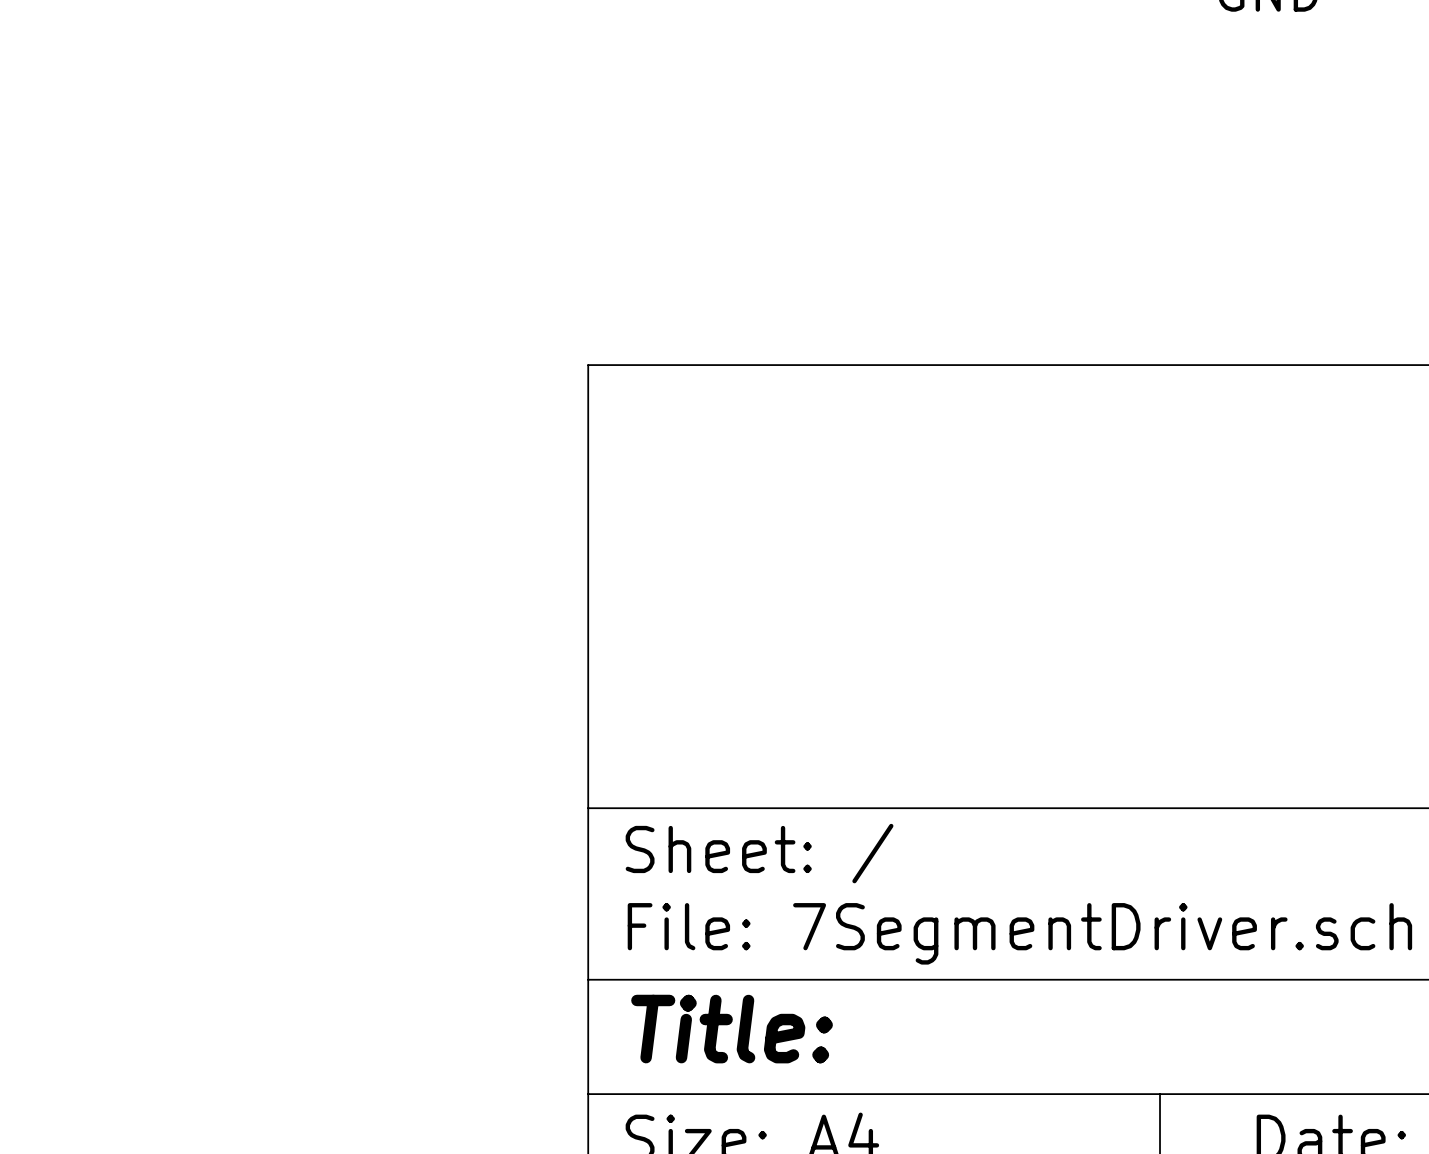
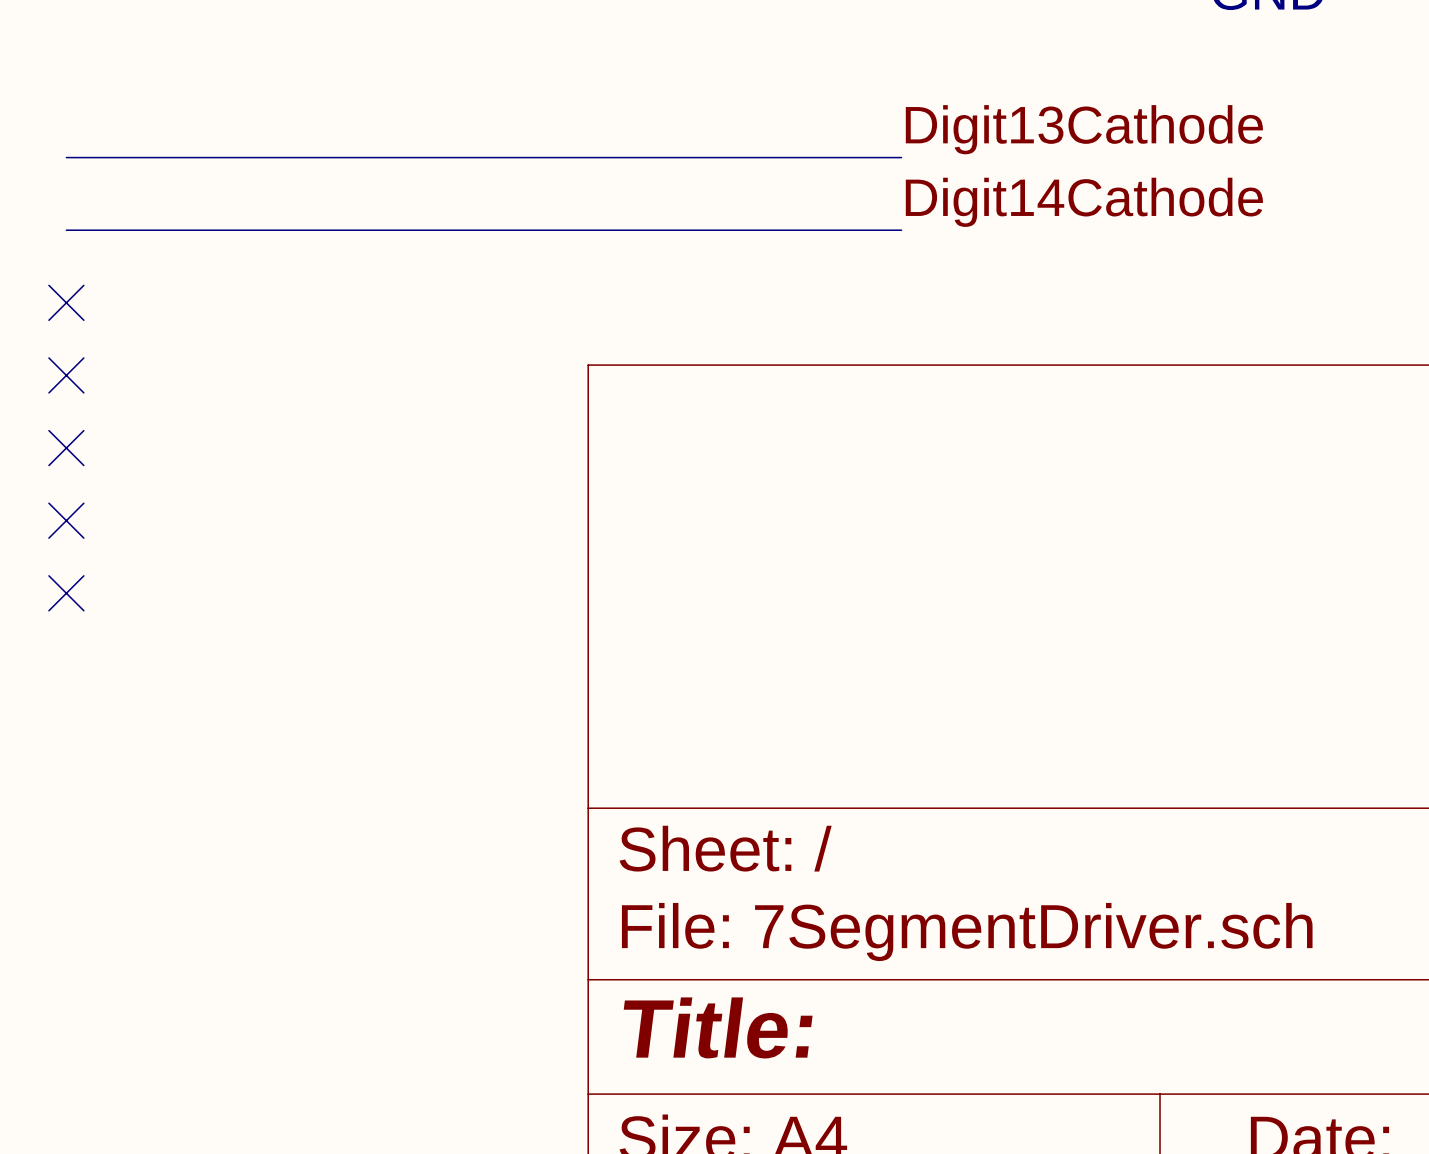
label: none -> Digit13Cathode (1084, 129)
wire: none -> (66, 157) (901, 157)
label: none -> Digit14Cathode (1084, 202)
wire: none -> (66, 230) (901, 230)
no-connect mark: none -> (66, 302)
no-connect mark: none -> (66, 375)
no-connect mark: none -> (66, 448)
no-connect mark: none -> (66, 520)
no-connect mark: none -> (66, 593)

